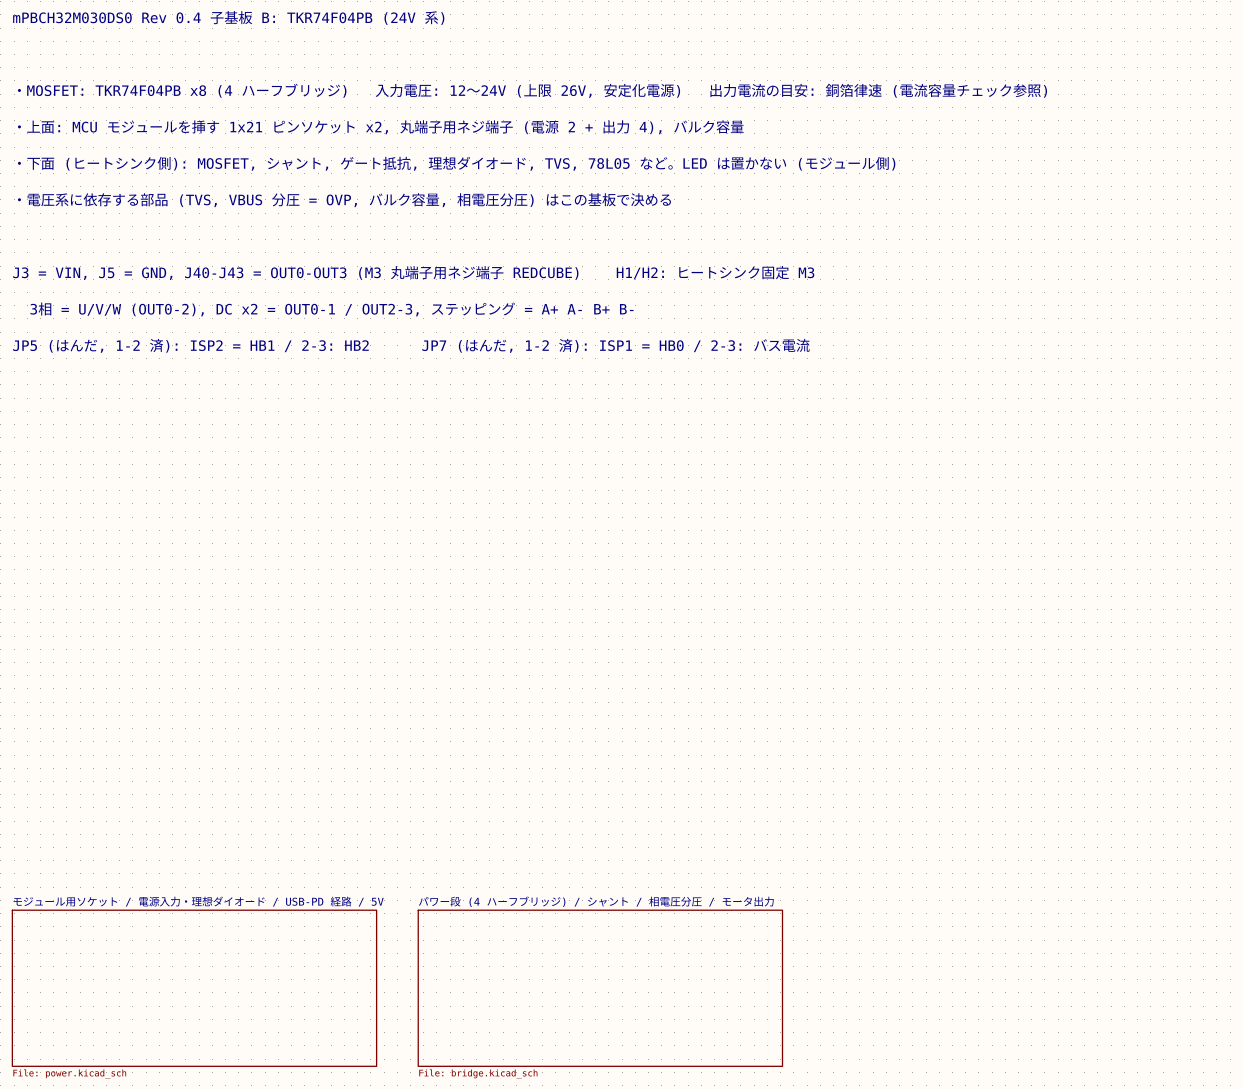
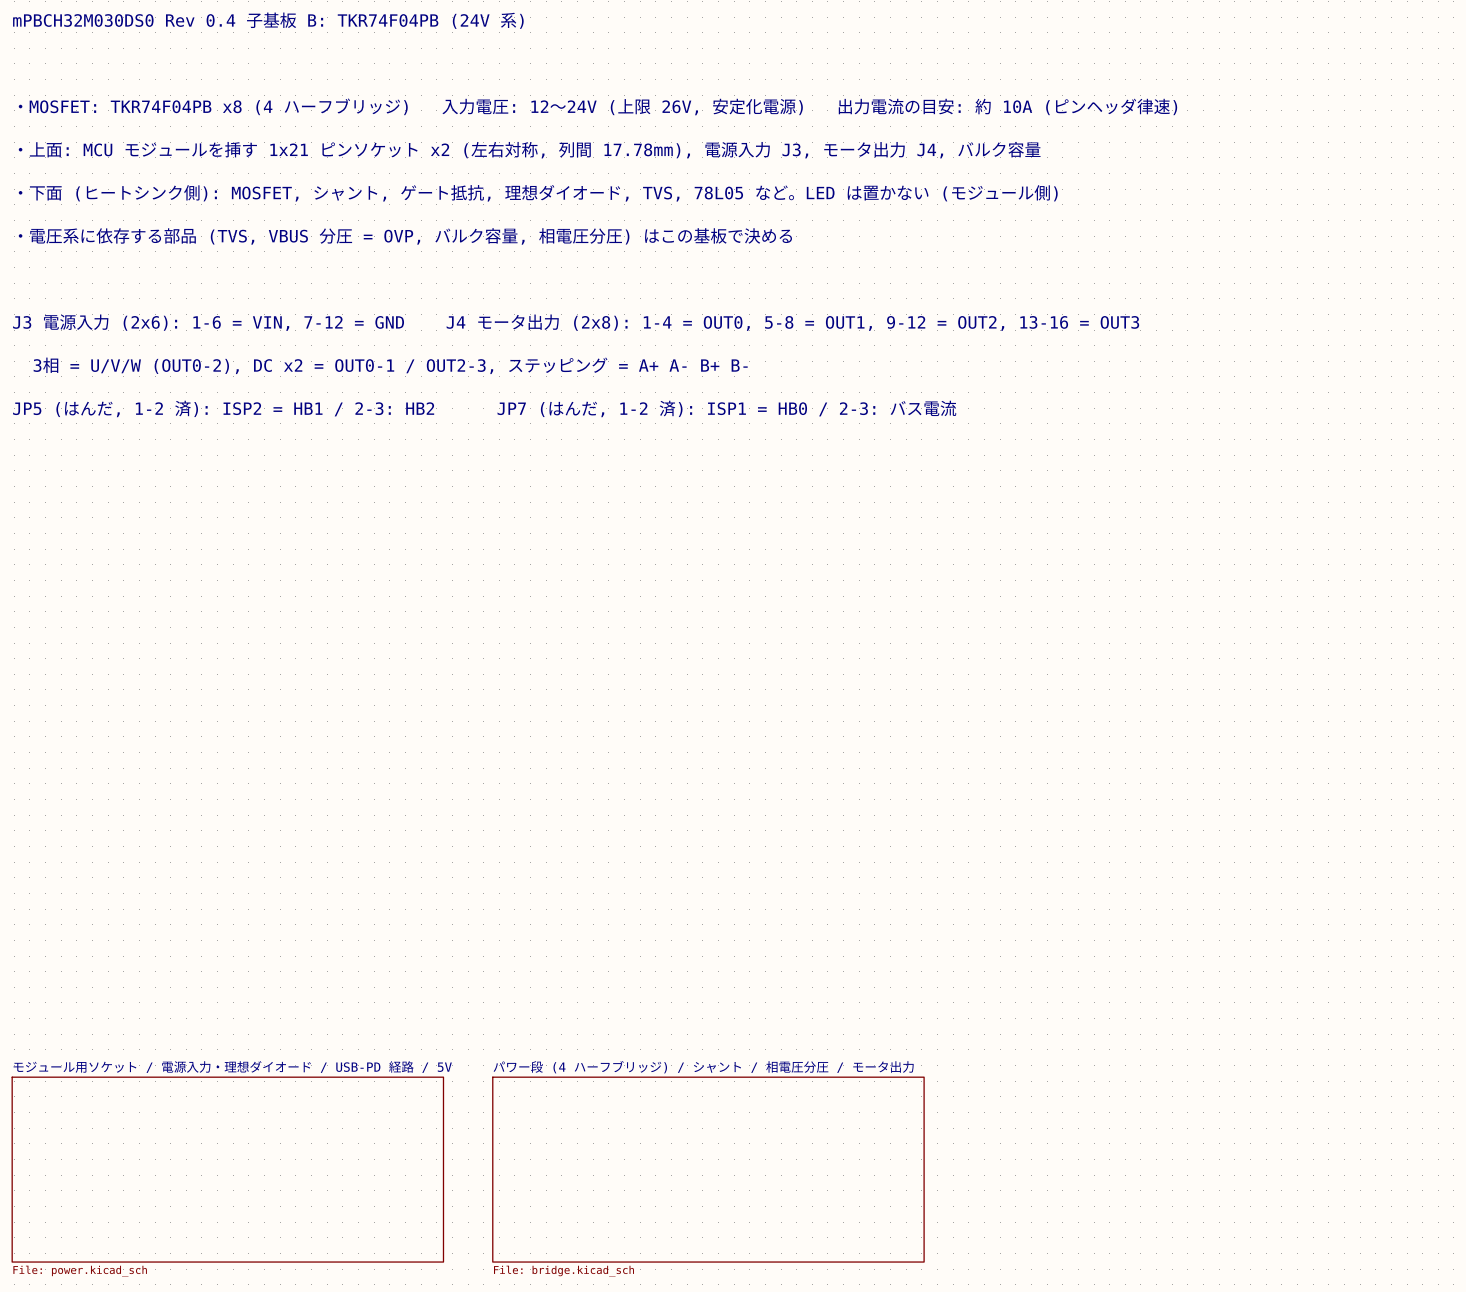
text: ・MOSFET: TKR74F04PB x8 (4 ハーフブリッジ) 入力電圧: 12〜24V (上限 26V, 安定化電源) 出力電流の目安: 銅箔律速 (電流容量チェック参照) (532, 90) -> ・MOSFET: TKR74F04PB x8 (4 ハーフブリッジ) 入力電圧: 12〜24V (上限 26V, 安定化電源) 出力電流の目安: 約 10A (ピンヘッダ律速) (597, 106)
text: ・上面: MCU モジュールを挿す 1x21 ピンソケット x2, 丸端子用ネジ端子 (電源 2 + 出力 4), バルク容量 (380, 127) -> ・上面: MCU モジュールを挿す 1x21 ピンソケット x2 (左右対称, 列間 17.78mm), 電源入力 J3, モータ出力 J4, バルク容量 (529, 150)
text: J3 = VIN, J5 = GND, J40-J43 = OUT0-OUT3 (M3 丸端子用ネジ端子 REDCUBE) H1/H2: ヒートシンク固定 M3 (413, 273) -> J3 電源入力 (2x6): 1-6 = VIN, 7-12 = GND J4 モータ出力 (2x8): 1-4 = OUT0, 5-8 = OUT1, 9-12 = OUT2, 13-16 = OUT3 (576, 322)

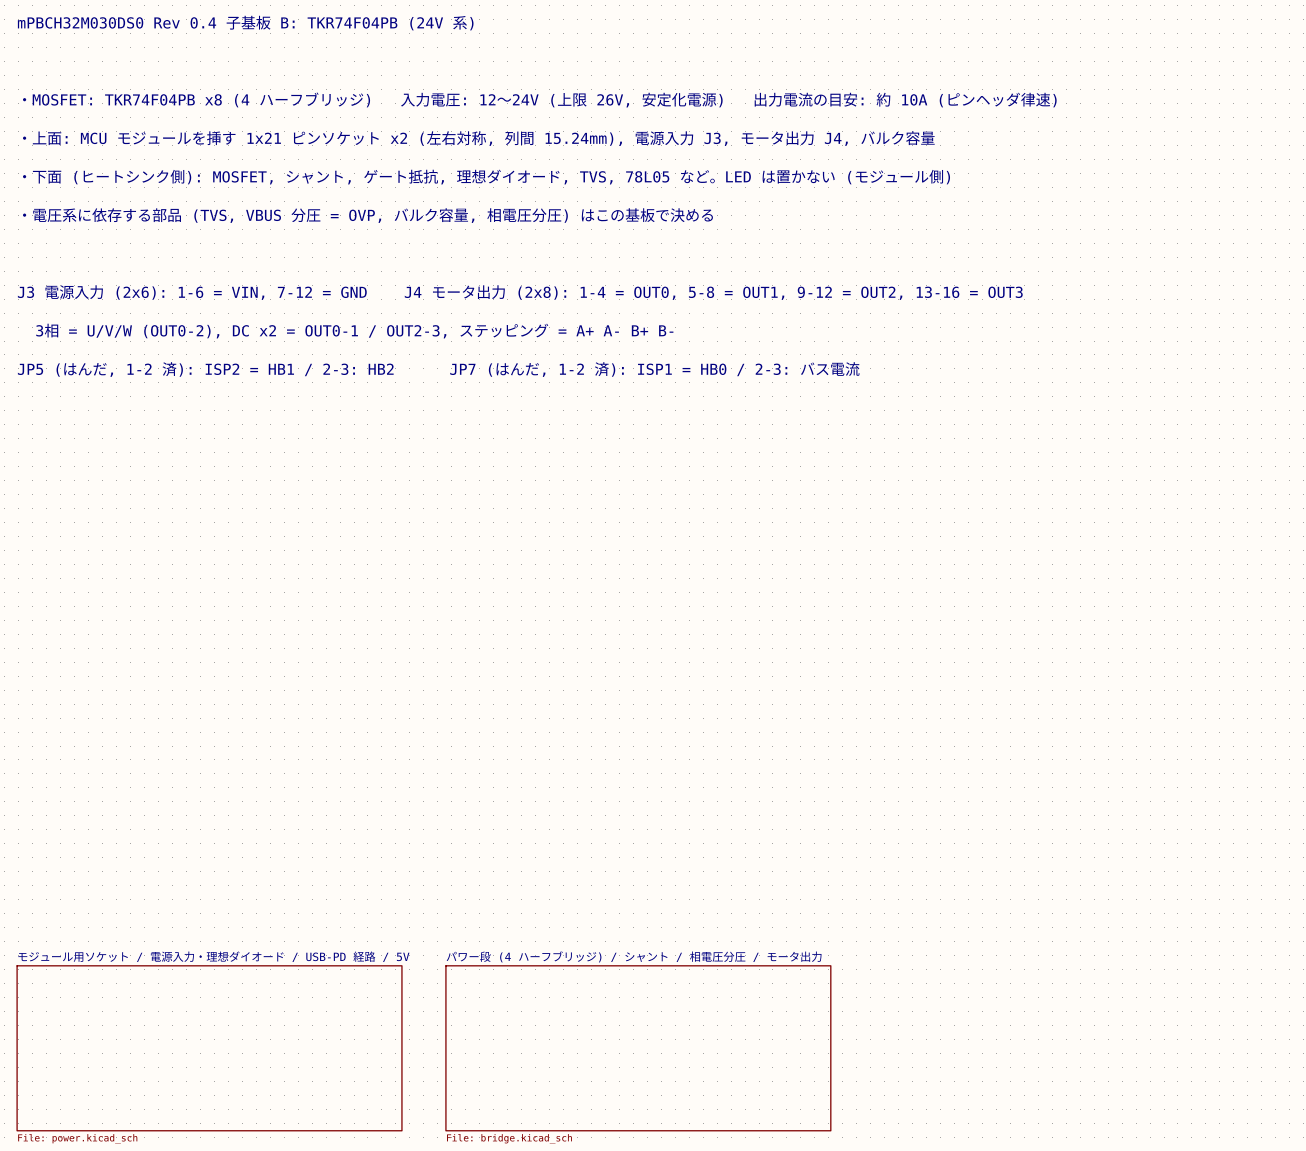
text: ・上面: MCU モジュールを挿す 1x21 ピンソケット x2 (左右対称, 列間 17.78mm), 電源入力 J3, モータ出力 J4, バルク容量 (529, 150) -> ・上面: MCU モジュールを挿す 1x21 ピンソケット x2 (左右対称, 列間 15.24mm), 電源入力 J3, モータ出力 J4, バルク容量 (478, 138)

